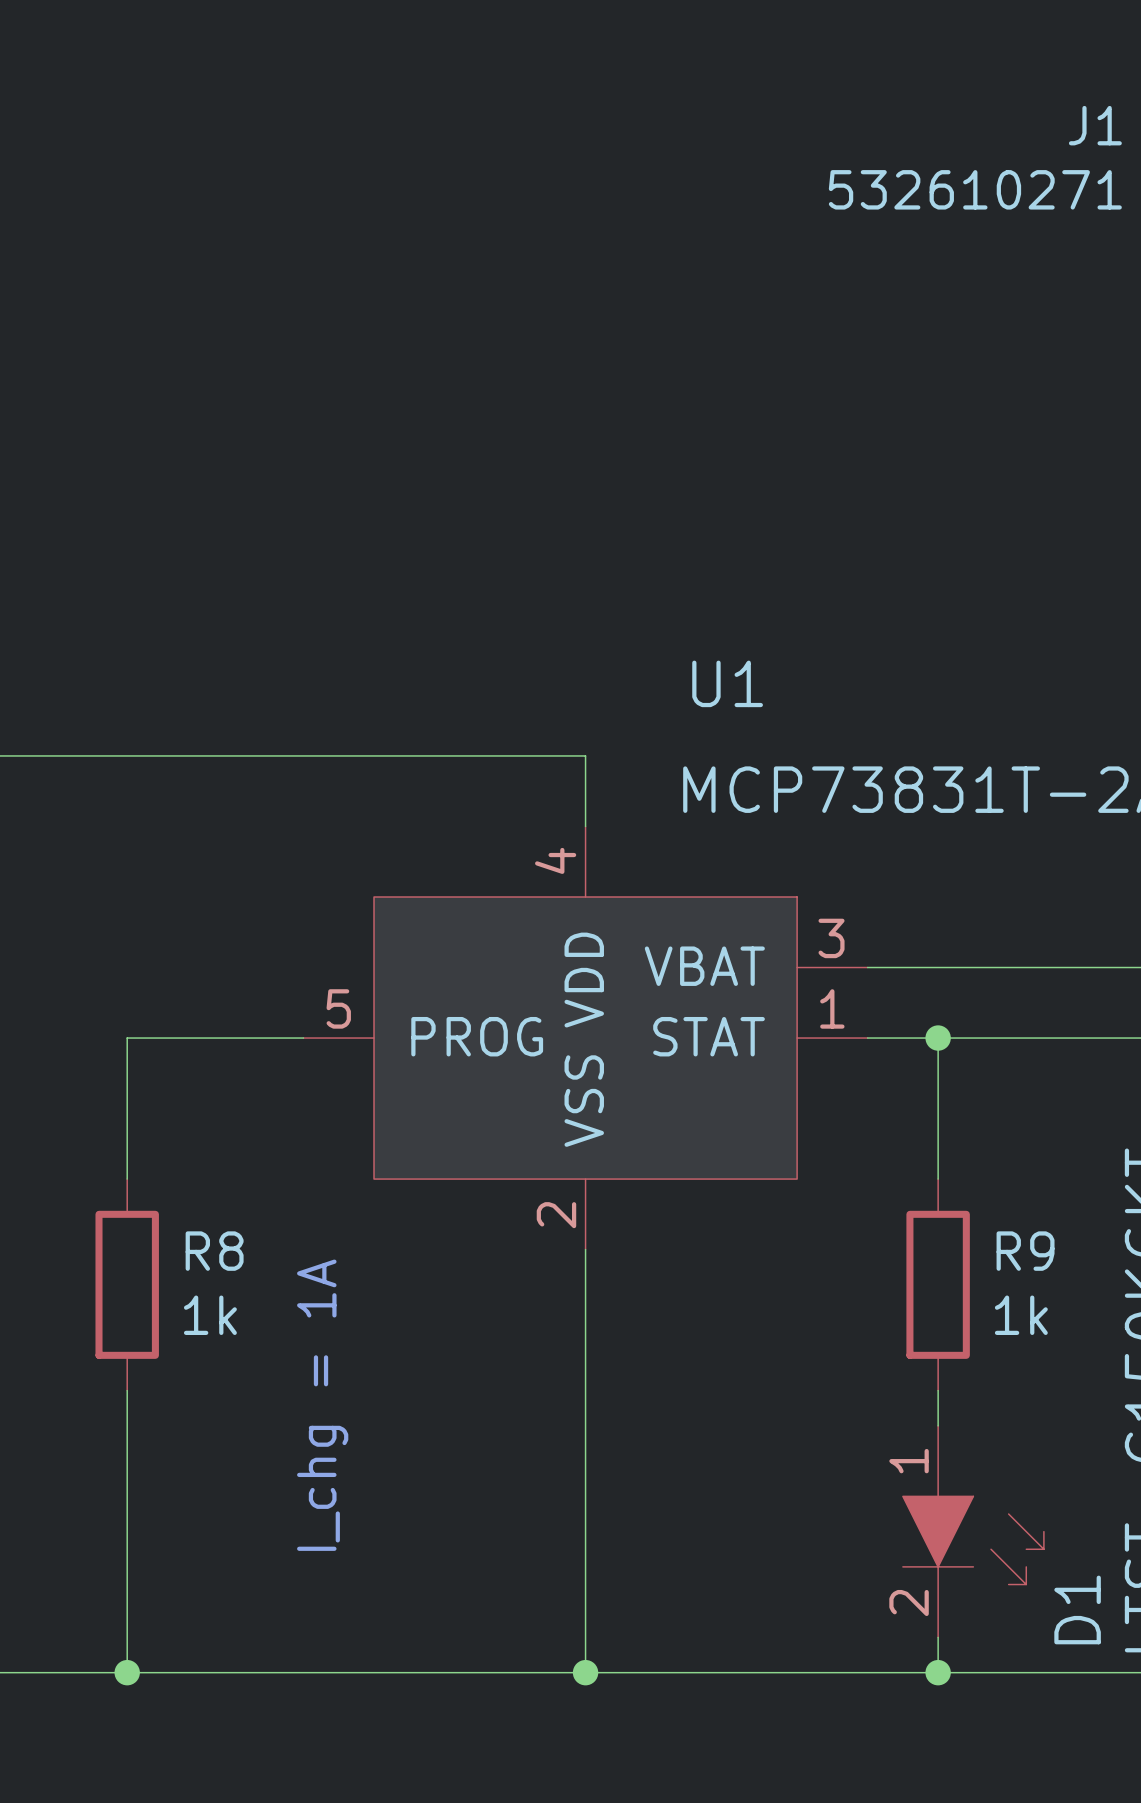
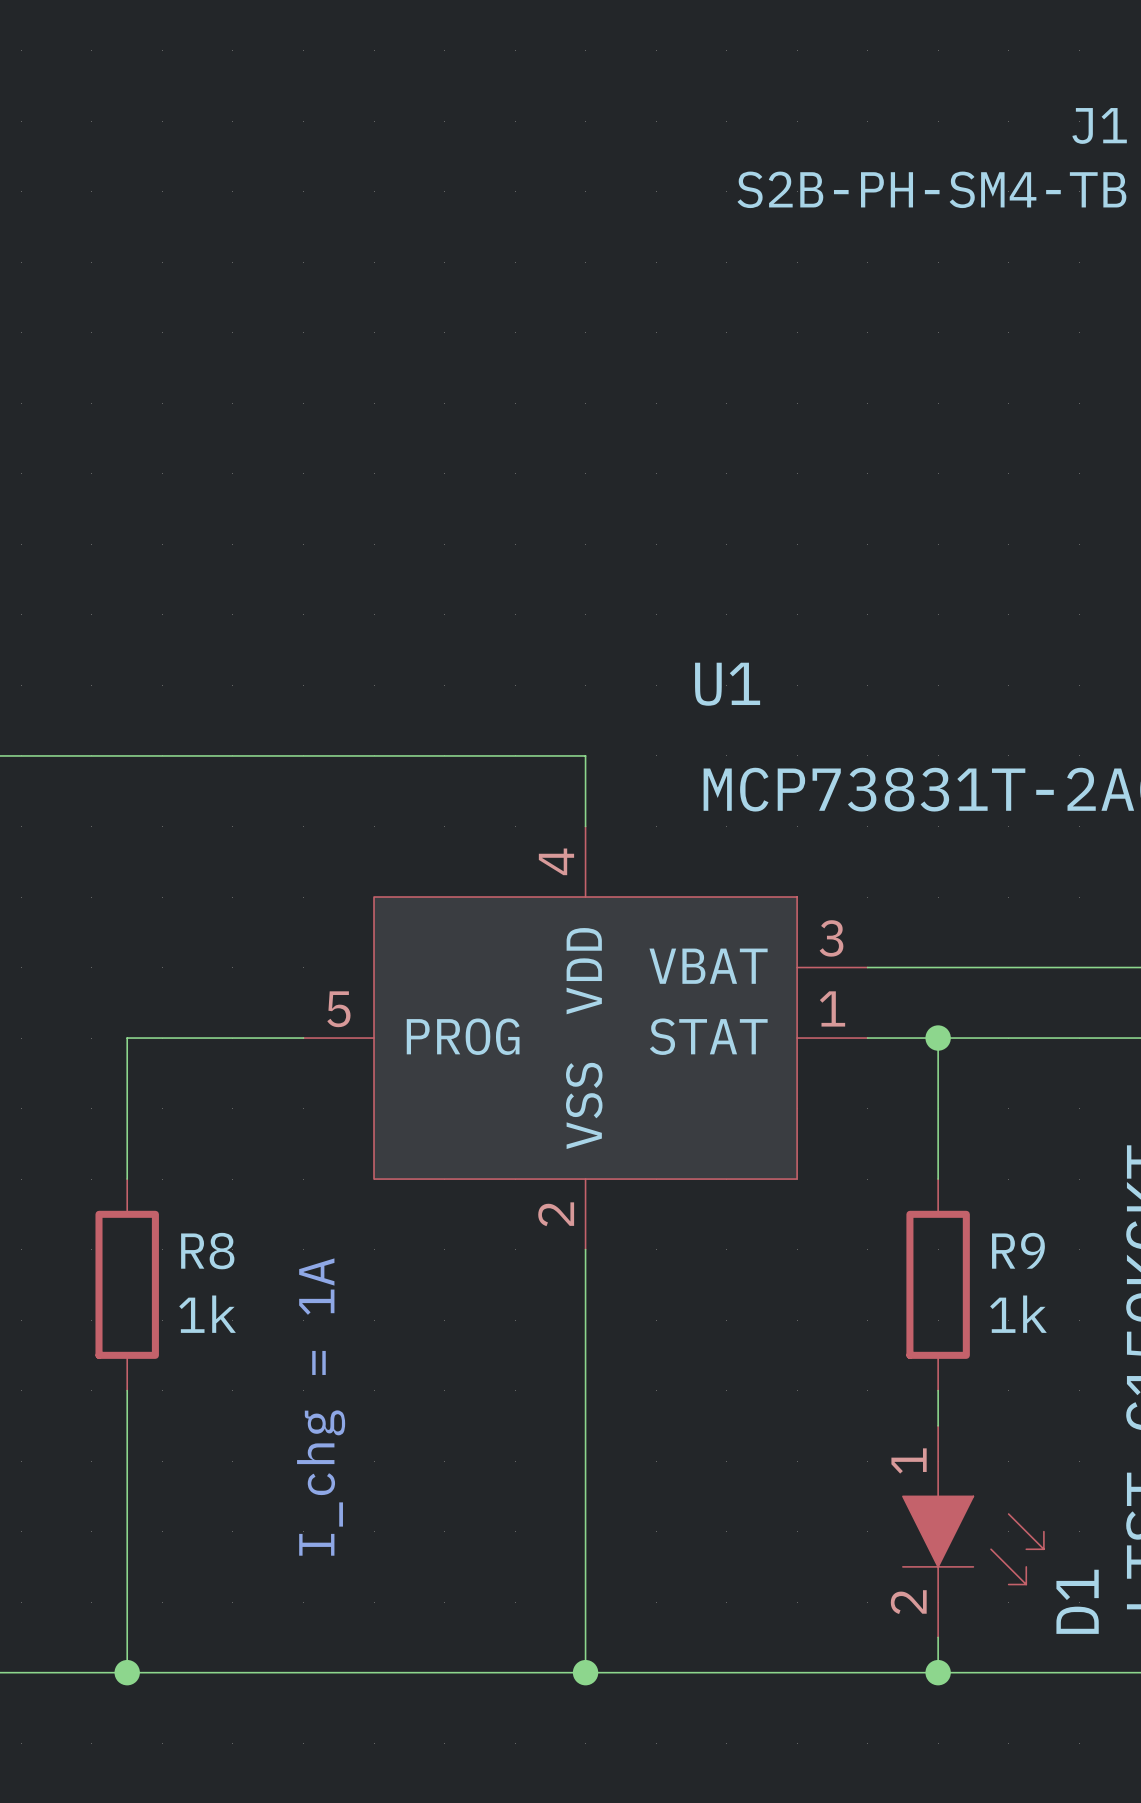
J1 value: 532610271 (975, 189) -> S2B-PH-SM4-TB (931, 189)

